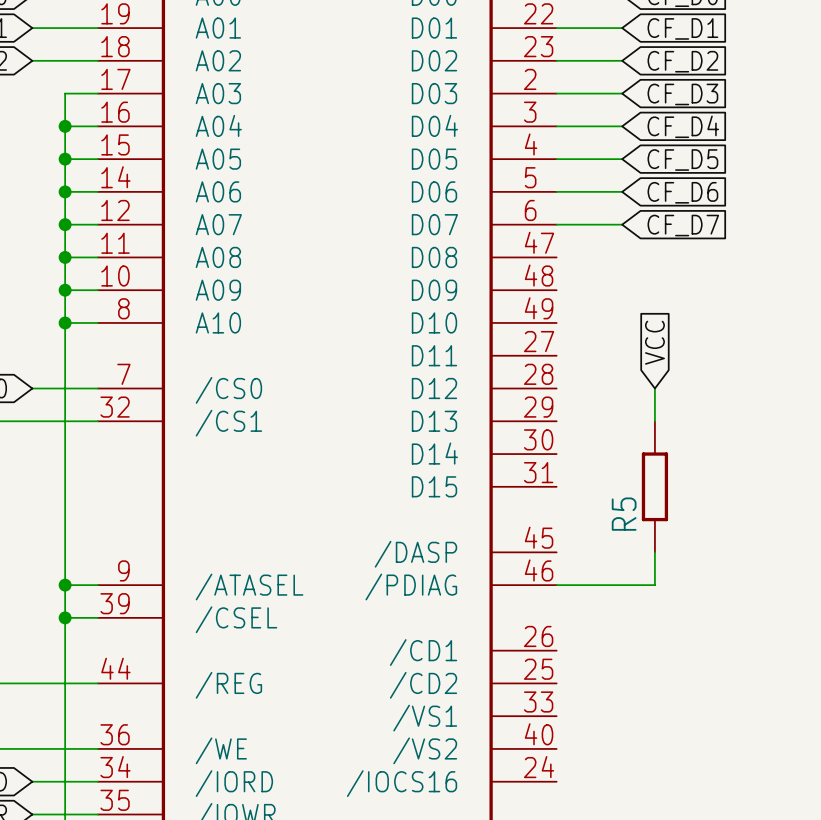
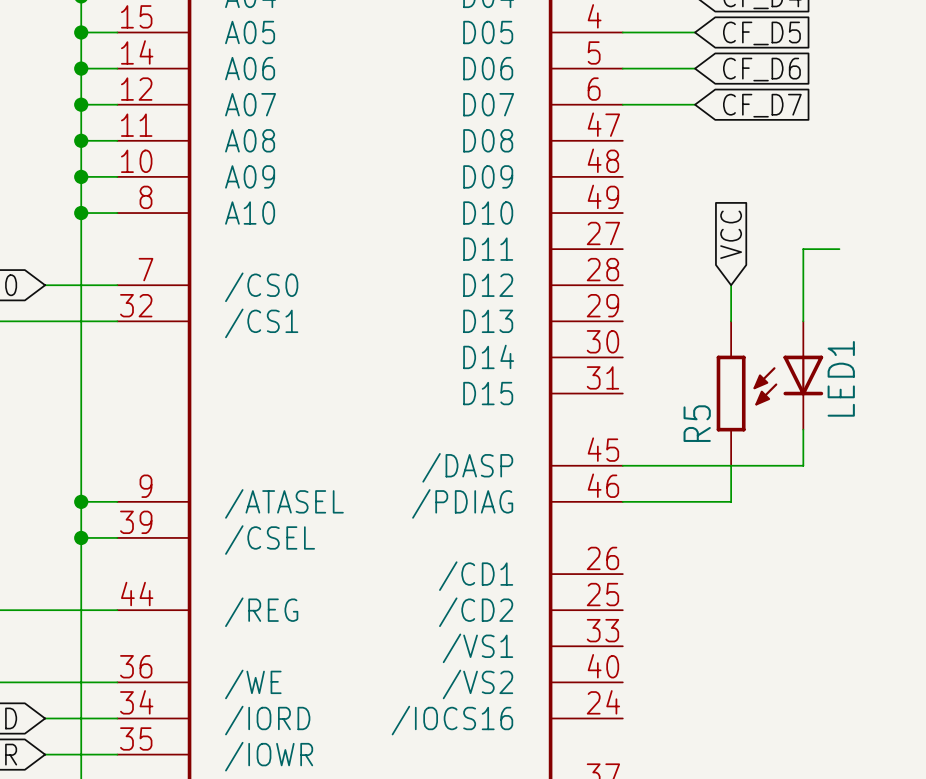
wire: none -> (839, 249) (803, 249) (803, 321)
LED1: none -> (788, 375)
wire: none -> (803, 429) (803, 465) (622, 465)

